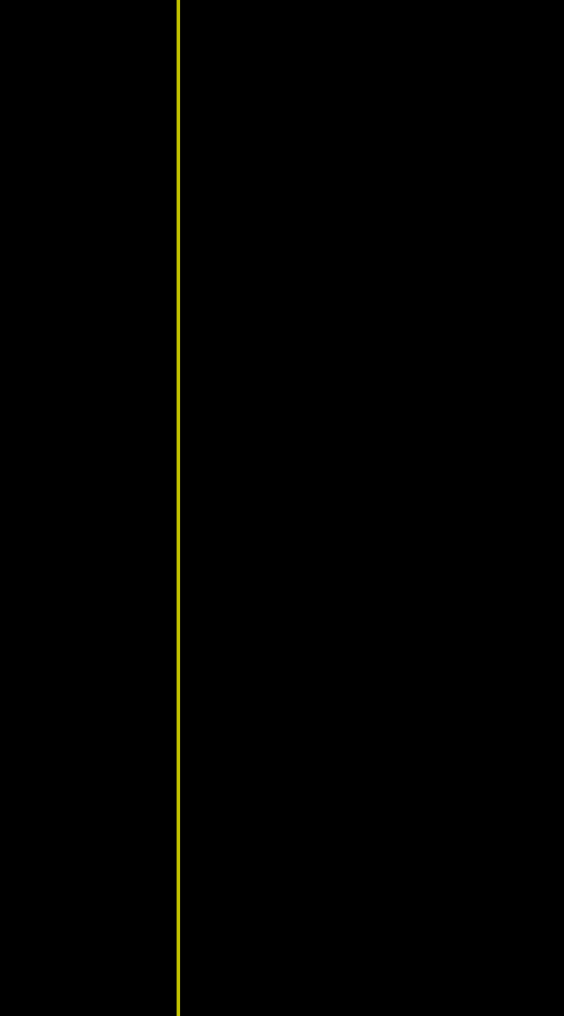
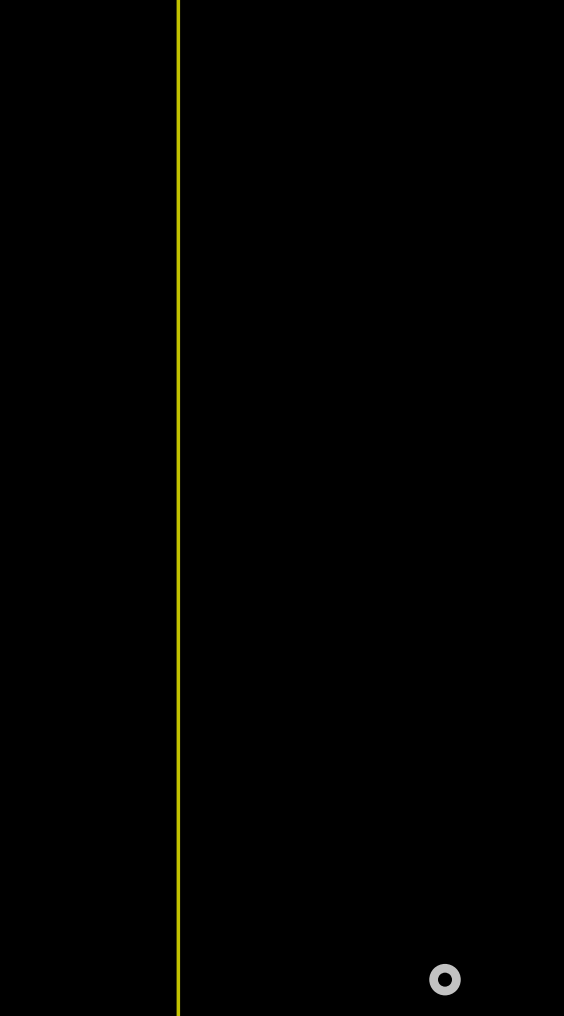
via: none -> (445, 979)

